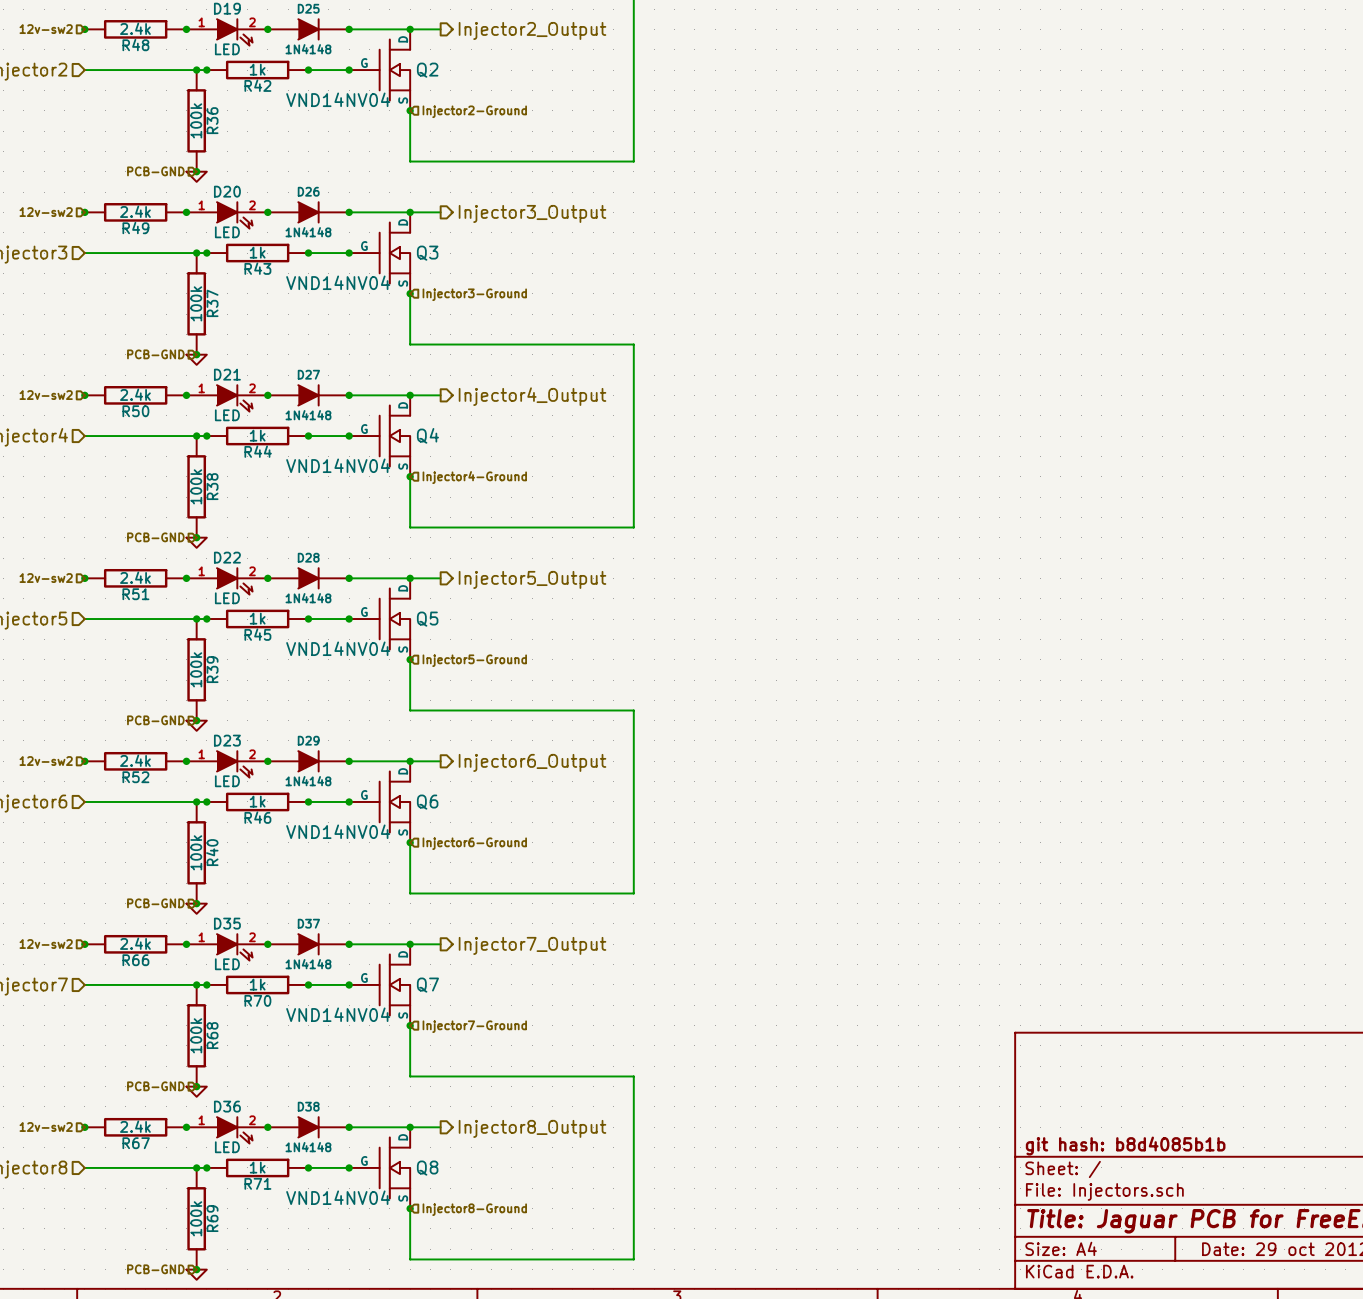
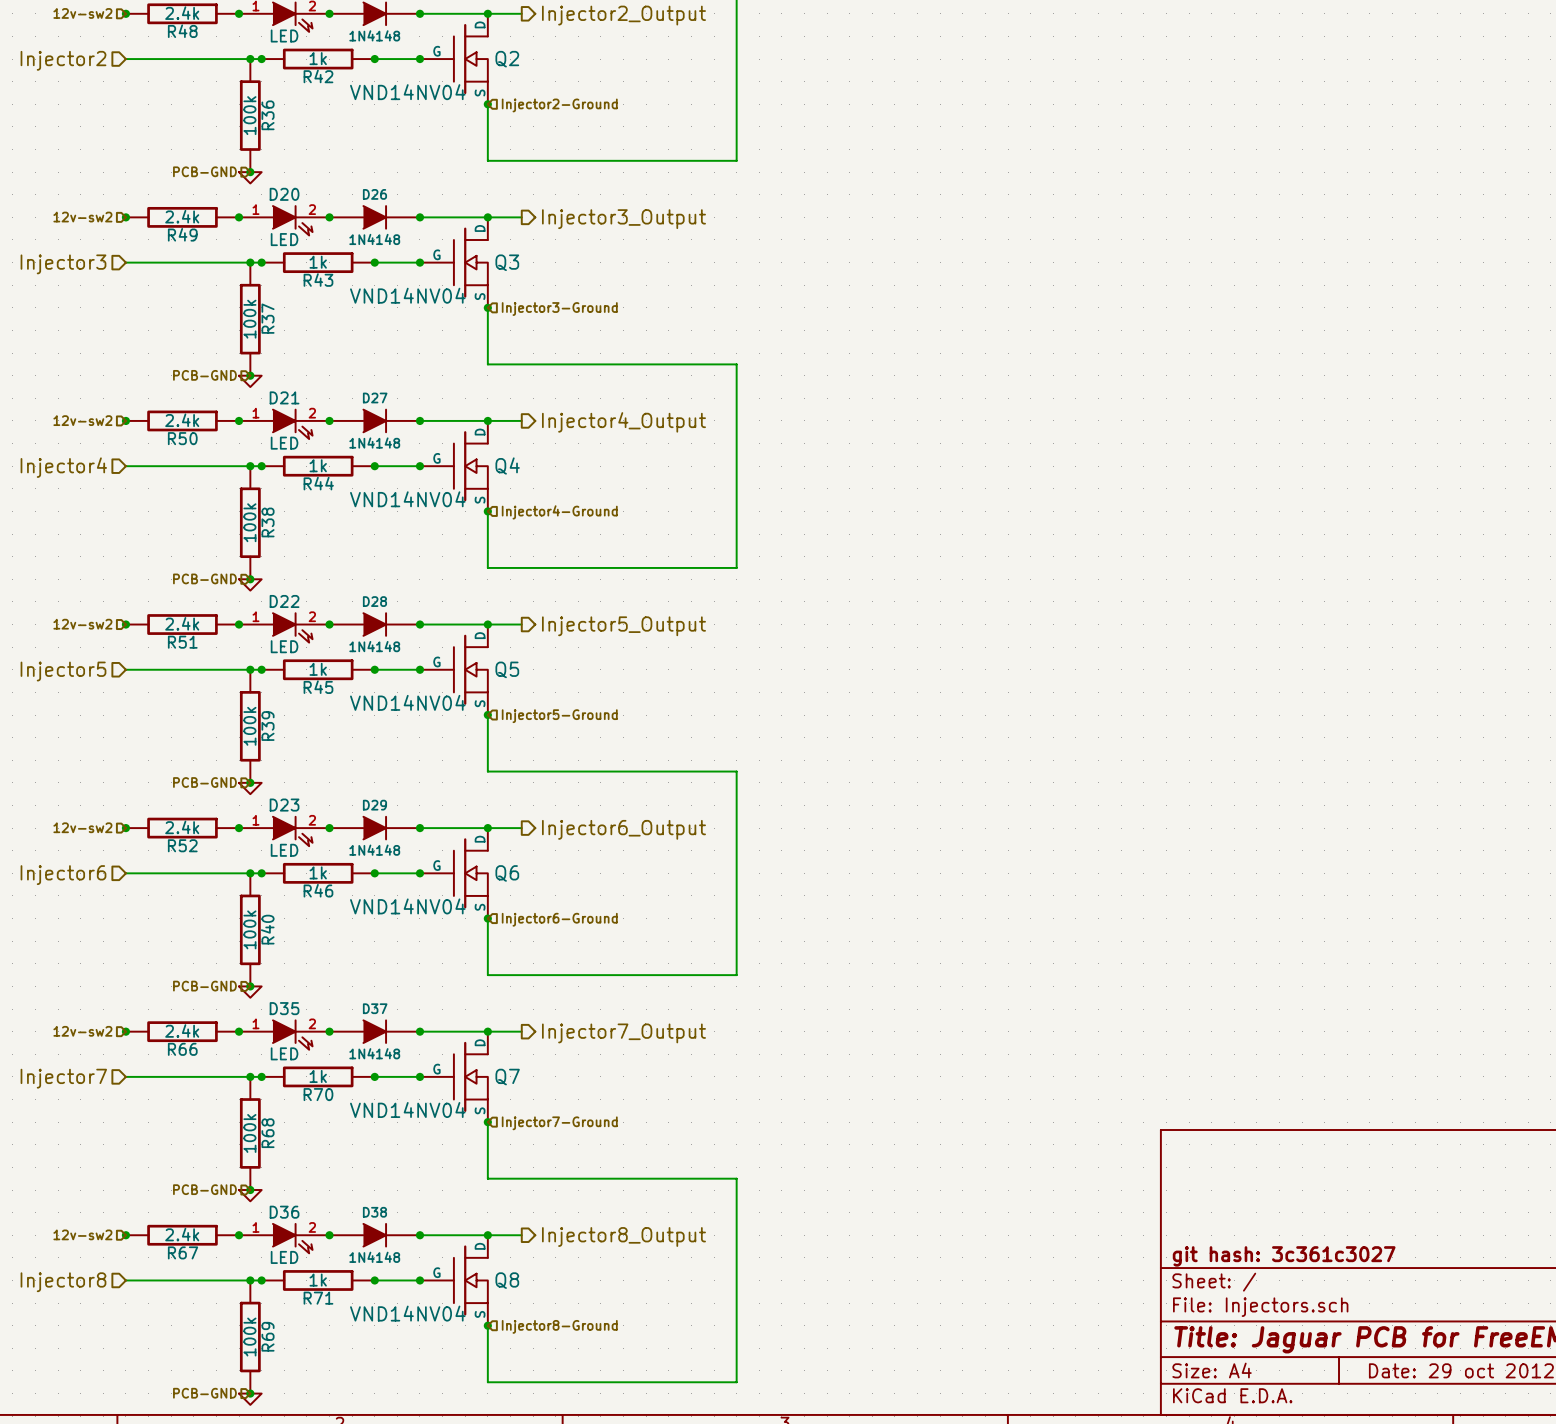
title block: git hash: b8d4085b1b (1125, 1146) -> git hash: 3c361c3027 (1284, 1256)

